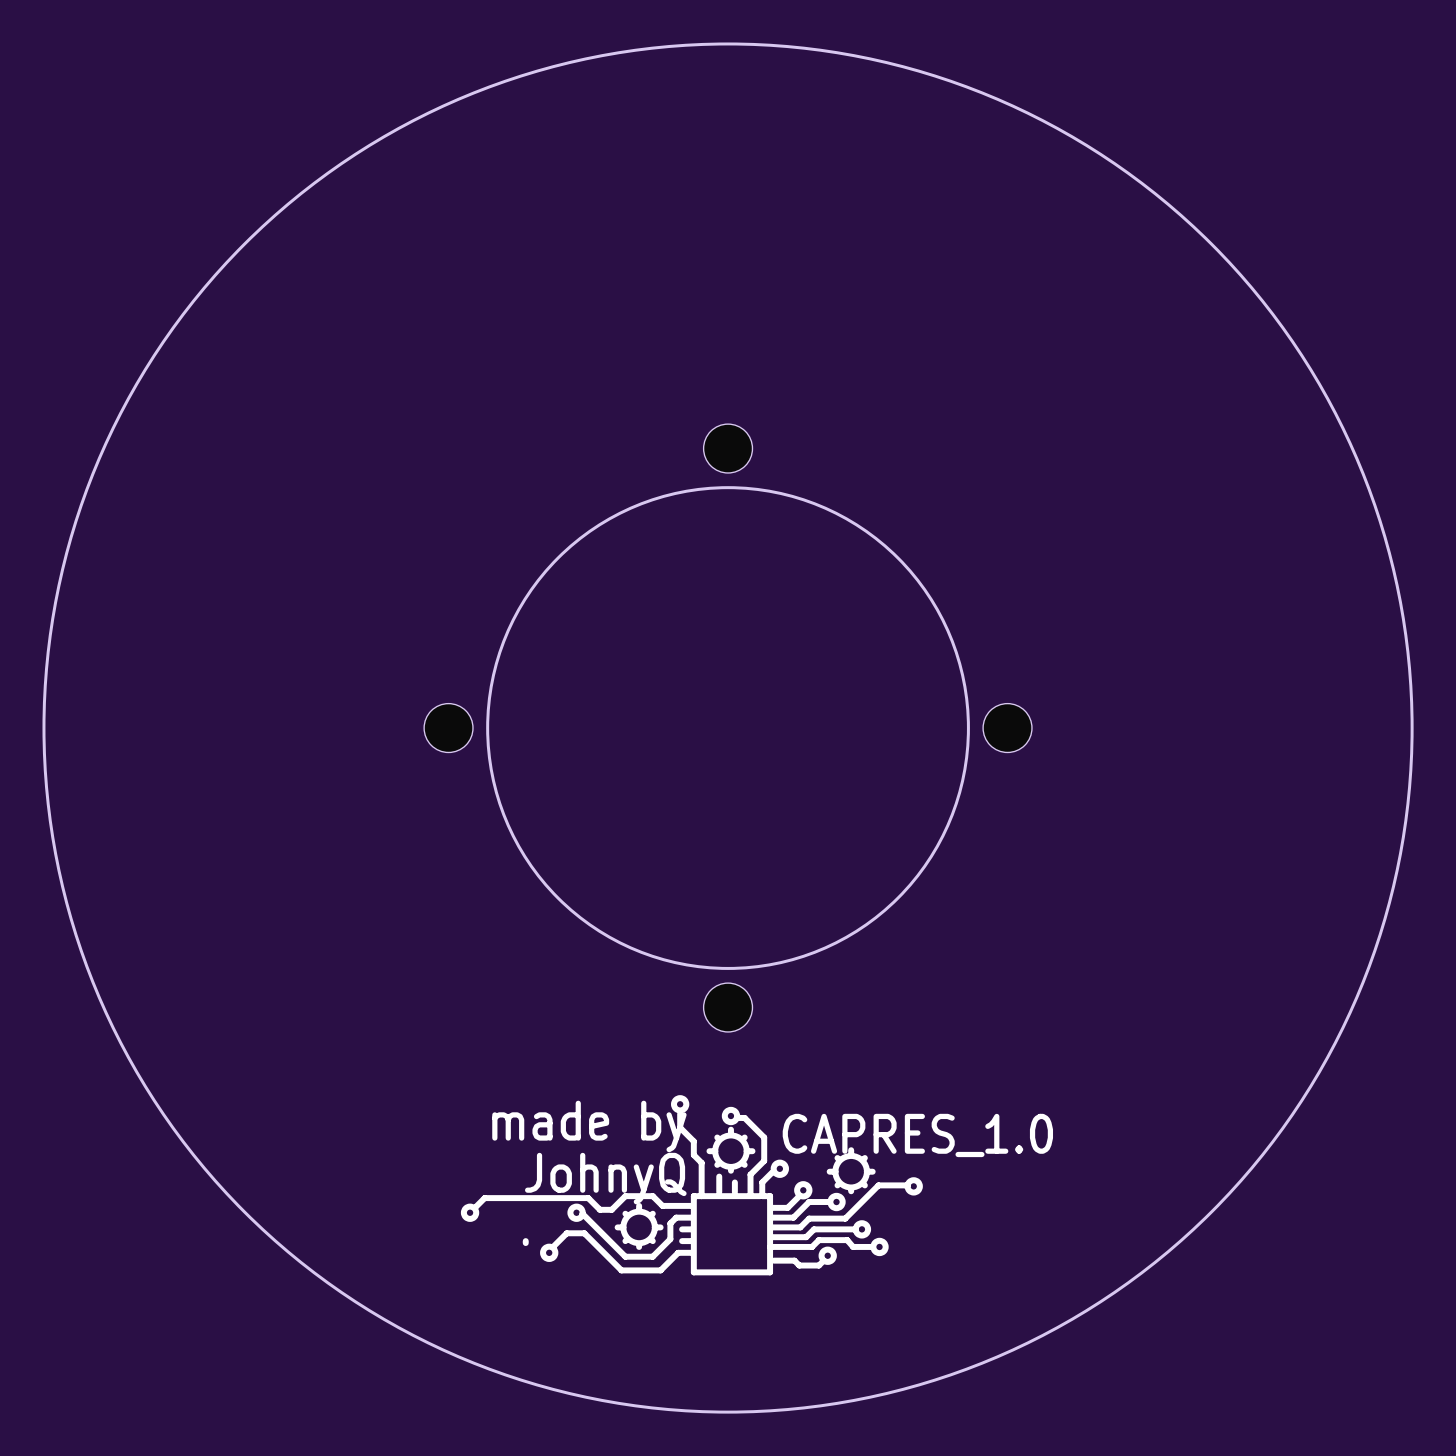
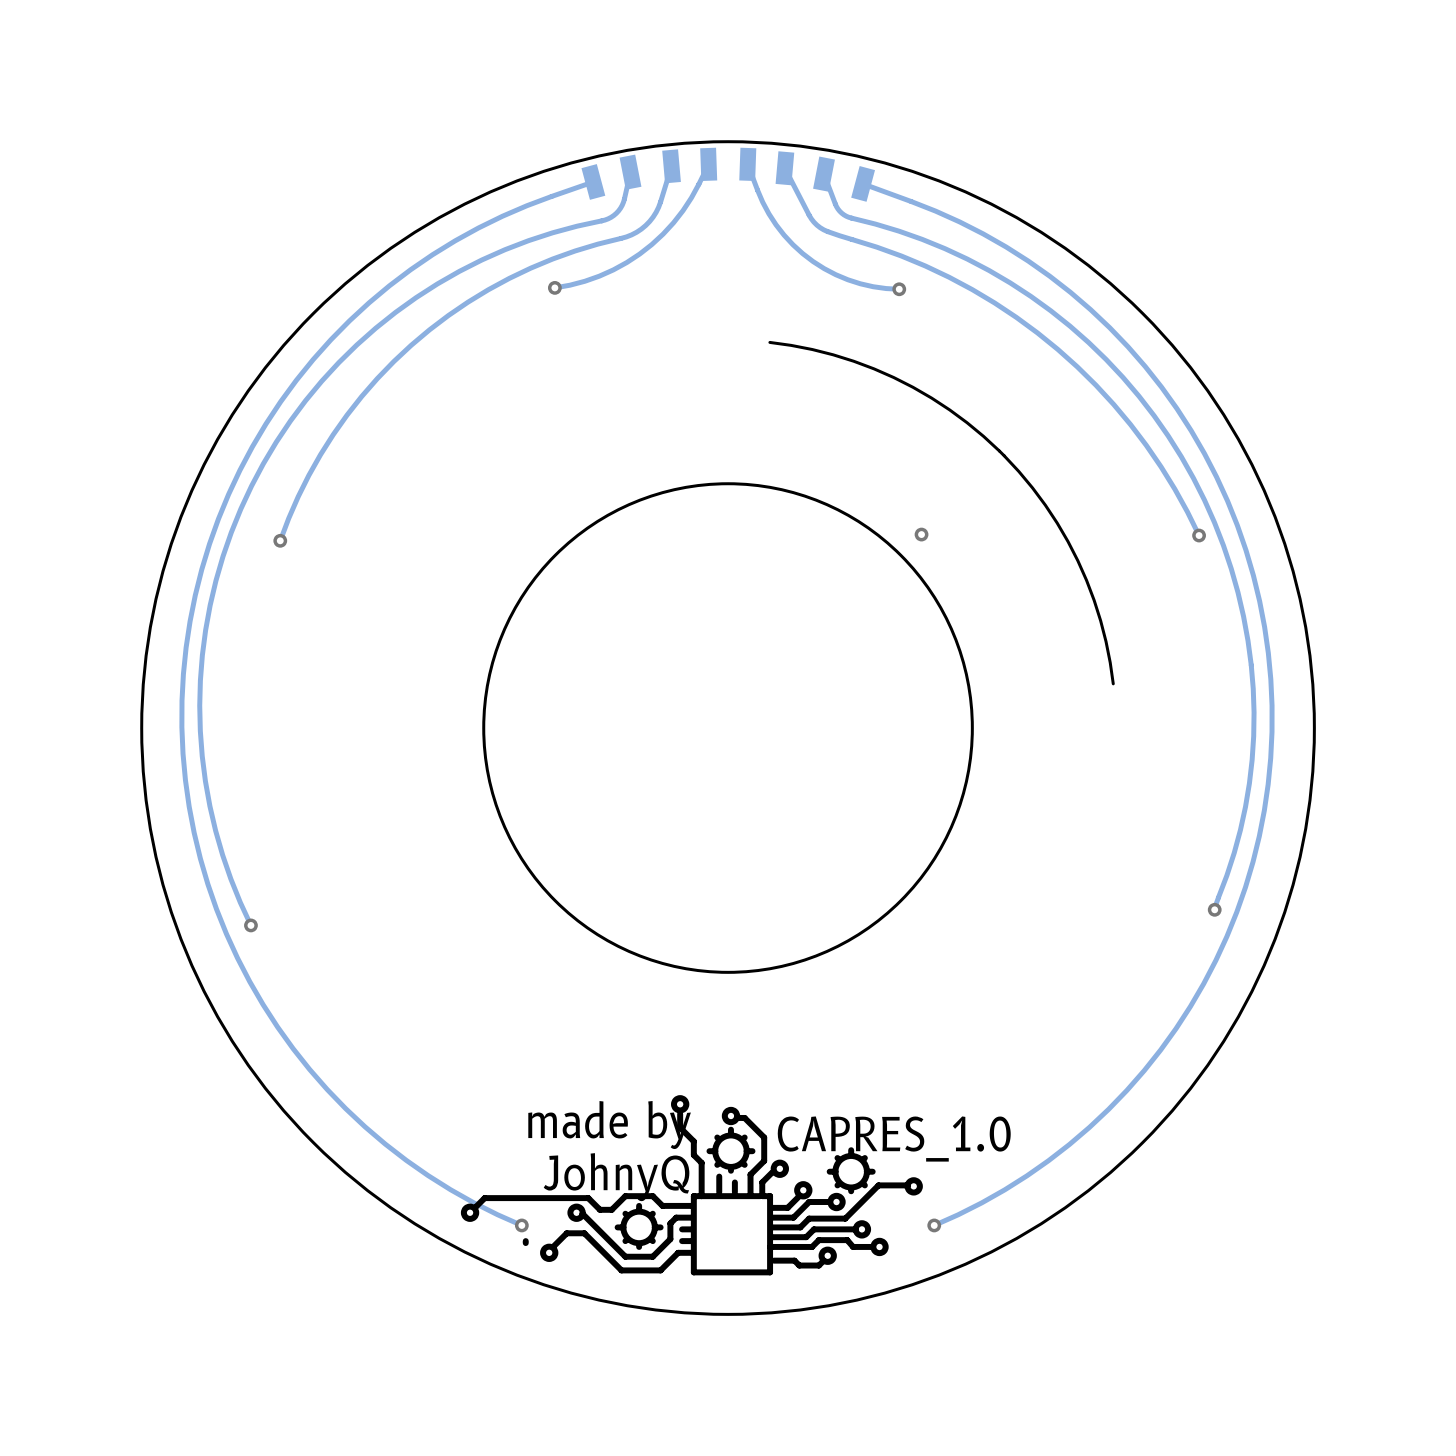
round board edge: [42, 42, 1414, 1414] -> none
round board edge: none -> [140, 140, 1316, 1316]
track: none -> (708, 164) (683, 210) (651, 244) (613, 269) (584, 281) (554, 287)
track: none -> (747, 164) (768, 213) (784, 235) (802, 253) (824, 268) (847, 279) (873, 286) (899, 289)
track: none -> (671, 166) (658, 207) (649, 221) (641, 229) (626, 236) (552, 259) (509, 278) (448, 315) (393, 361) (361, 396) (333, 434) (298, 496) (280, 540)
track: none -> (784, 168) (809, 215) (820, 227) (901, 256) (949, 277) (1016, 317) (1057, 349) (1095, 385) (1146, 445) (1174, 489) (1199, 535)
track: none -> (630, 172) (622, 205) (611, 217) (528, 240) (481, 259) (416, 297) (375, 328) (338, 362) (305, 400) (276, 442) (251, 486) (231, 532) (210, 605) (202, 655) (199, 705) (202, 756) (215, 830) (230, 879) (250, 925)
part: none -> (728, 174)
track: none -> (824, 174) (836, 206) (843, 214) (922, 239) (967, 259) (1030, 296) (1070, 326) (1106, 359) (1139, 396) (1168, 435) (1193, 478) (1214, 522) (1231, 568) (1243, 616) (1253, 688) (1253, 736) (1245, 806) (1234, 852) (1214, 909)
track: none -> (593, 181) (502, 216) (432, 254) (369, 302) (313, 359) (265, 423) (228, 494) (201, 569) (190, 621) (183, 674) (181, 727) (185, 780) (200, 858) (226, 933) (263, 1004) (309, 1069) (365, 1126) (406, 1160) (450, 1189) (521, 1225)
track: none -> (863, 183) (959, 221) (1028, 261) (1090, 309) (1145, 366) (1191, 430) (1227, 500) (1245, 550) (1259, 601) (1270, 679) (1270, 758) (1259, 836) (1236, 912) (1215, 960) (1190, 1006) (1160, 1050) (1126, 1090) (1069, 1144) (1004, 1189) (934, 1225)
via: none -> (554, 287)
via: none -> (899, 289)
board edge: none -> (769, 342) (833, 354) (893, 377) (949, 409) (999, 451) (1018, 471) (1045, 505) (1077, 560) (1100, 620) (1113, 683)
hole: (728, 448) -> none
round board edge: none -> [482, 482, 974, 974]
round board edge: [486, 486, 970, 970] -> none
via: none -> (921, 534)
via: none -> (1199, 535)
via: none -> (280, 540)
hole: (448, 728) -> none
hole: (1007, 728) -> none
via: none -> (1214, 909)
via: none -> (250, 925)
hole: (728, 1007) -> none
via: none -> (521, 1225)
via: none -> (934, 1225)

